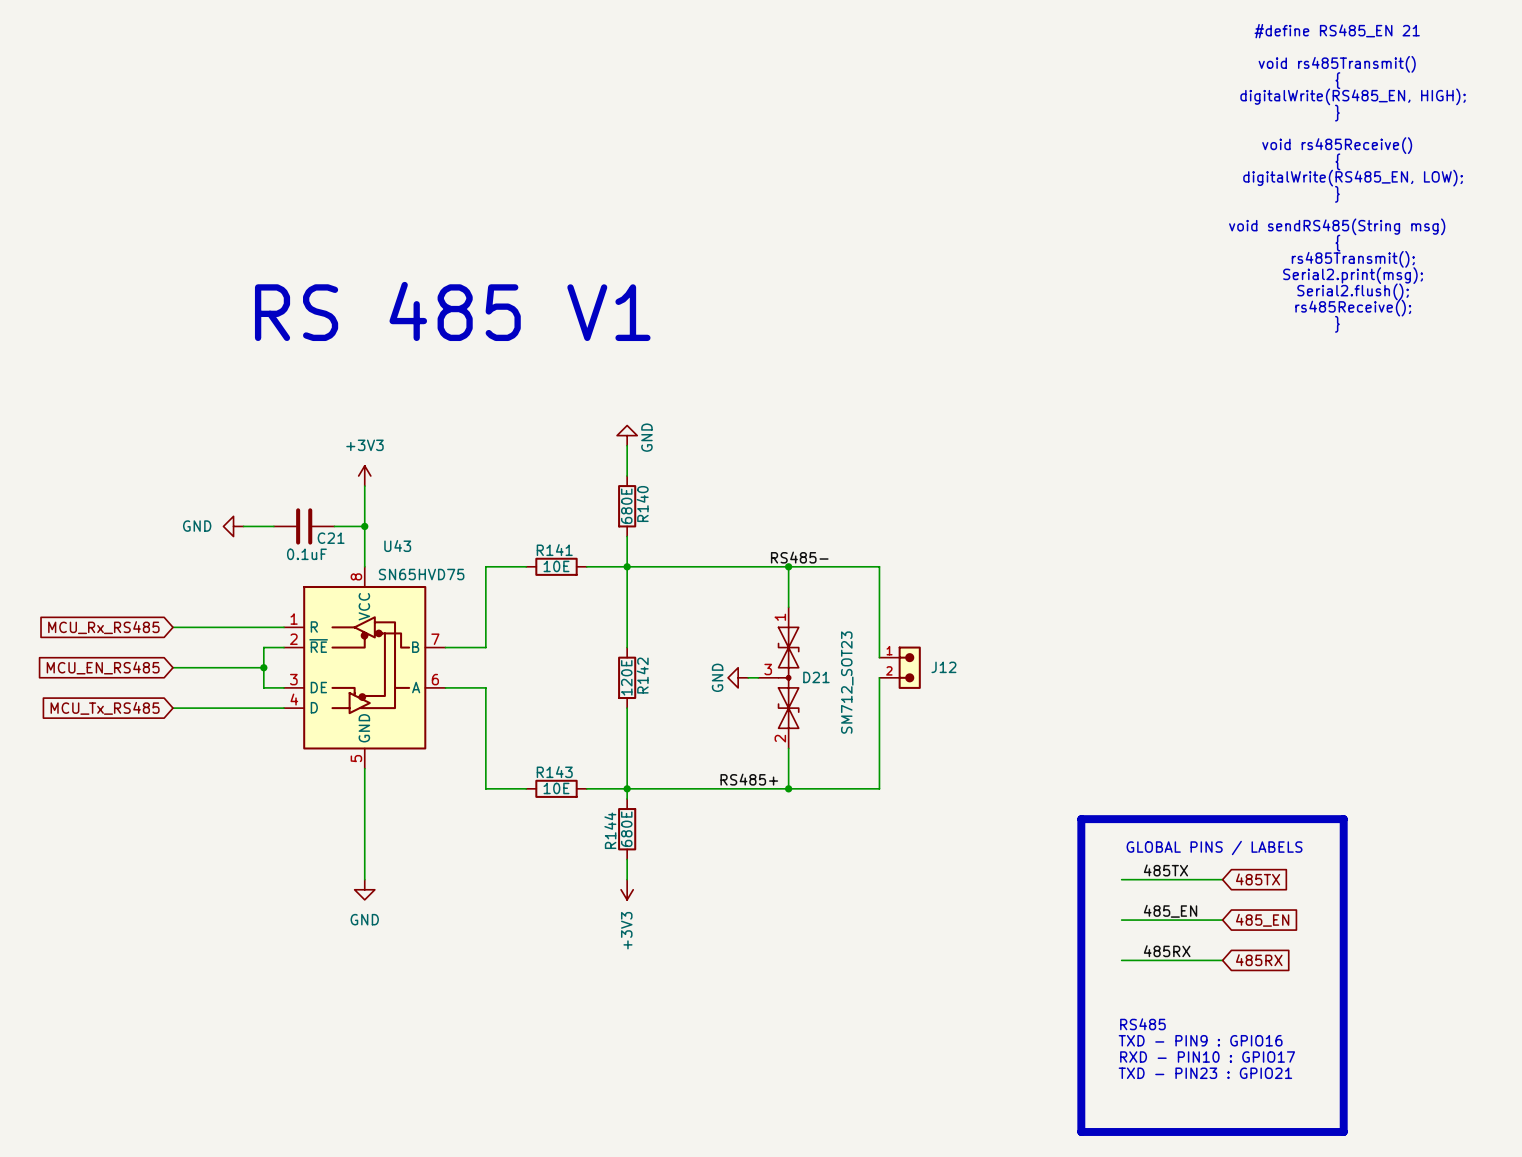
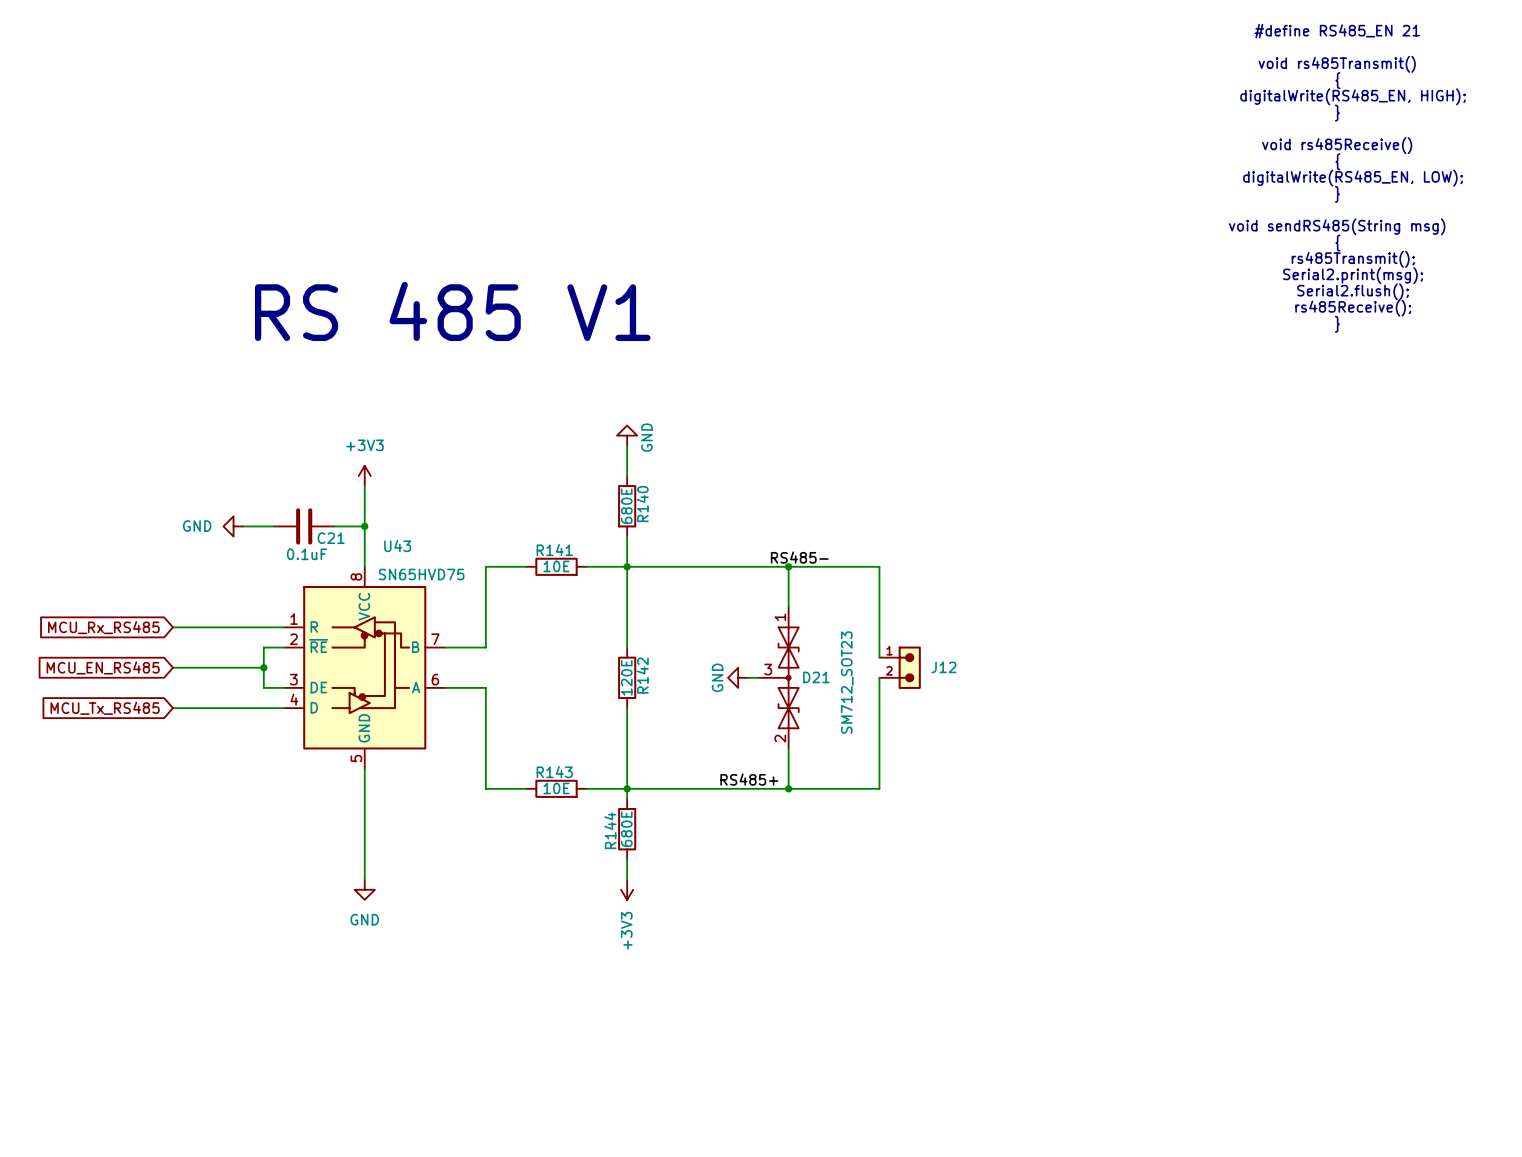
line: (1081, 819) (1343, 819) (1343, 1131) (1081, 1131) (1081, 819) -> none
text: GLOBAL PINS / LABELS (1214, 848) -> none
label: 485TX (1165, 870) -> none
wire: (1121, 879) (1222, 879) -> none
global label: 485TX (1258, 879) -> none
label: 485_EN (1170, 911) -> none
wire: (1121, 920) (1222, 920) -> none
global label: 485_EN (1262, 920) -> none
label: 485RX (1167, 951) -> none
wire: (1121, 960) (1222, 960) -> none
global label: 485RX (1259, 960) -> none
text: RS485 (1142, 1024) -> none
text: TXD - PIN9 : GPIO16 (1200, 1040) -> none
text: RXD - PIN10 : GPIO17 (1207, 1057) -> none
text: TXD - PIN23 : GPIO21 (1205, 1073) -> none

